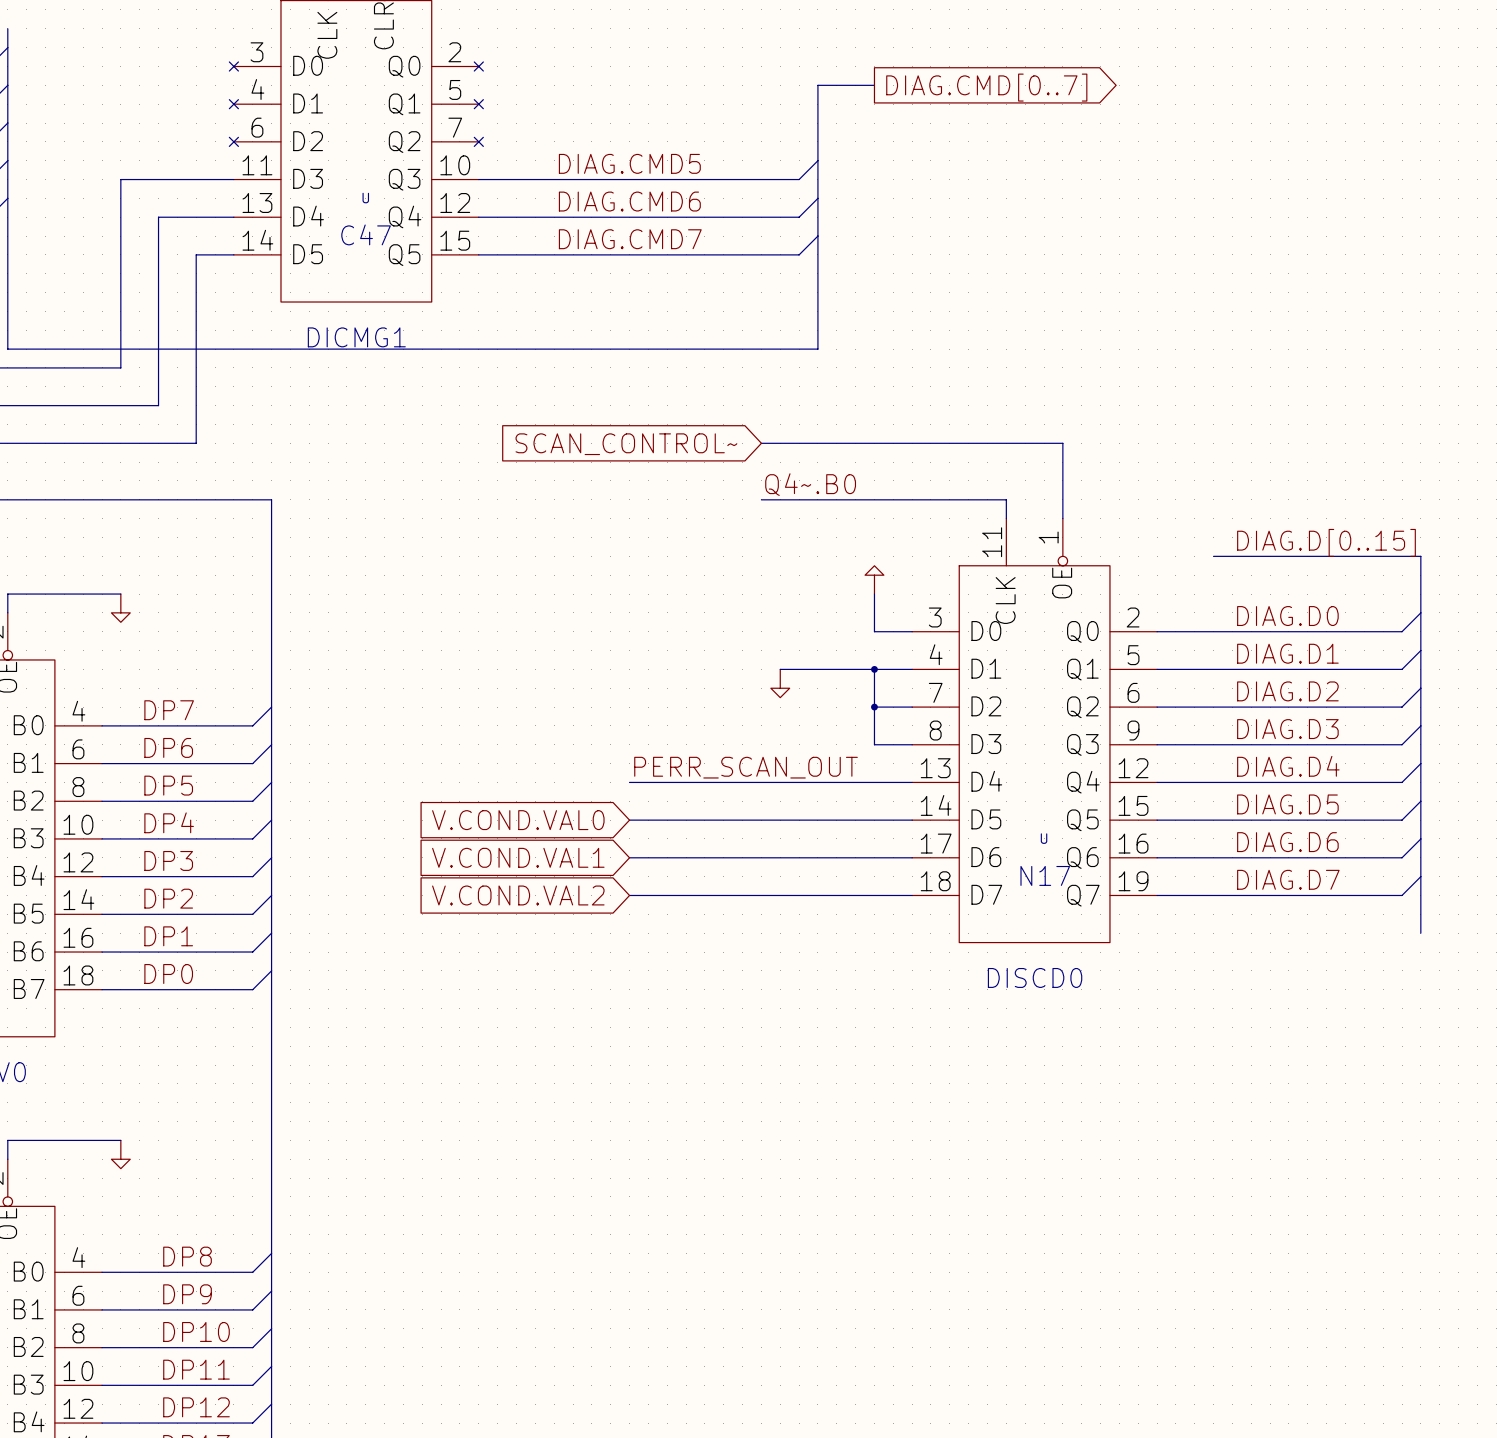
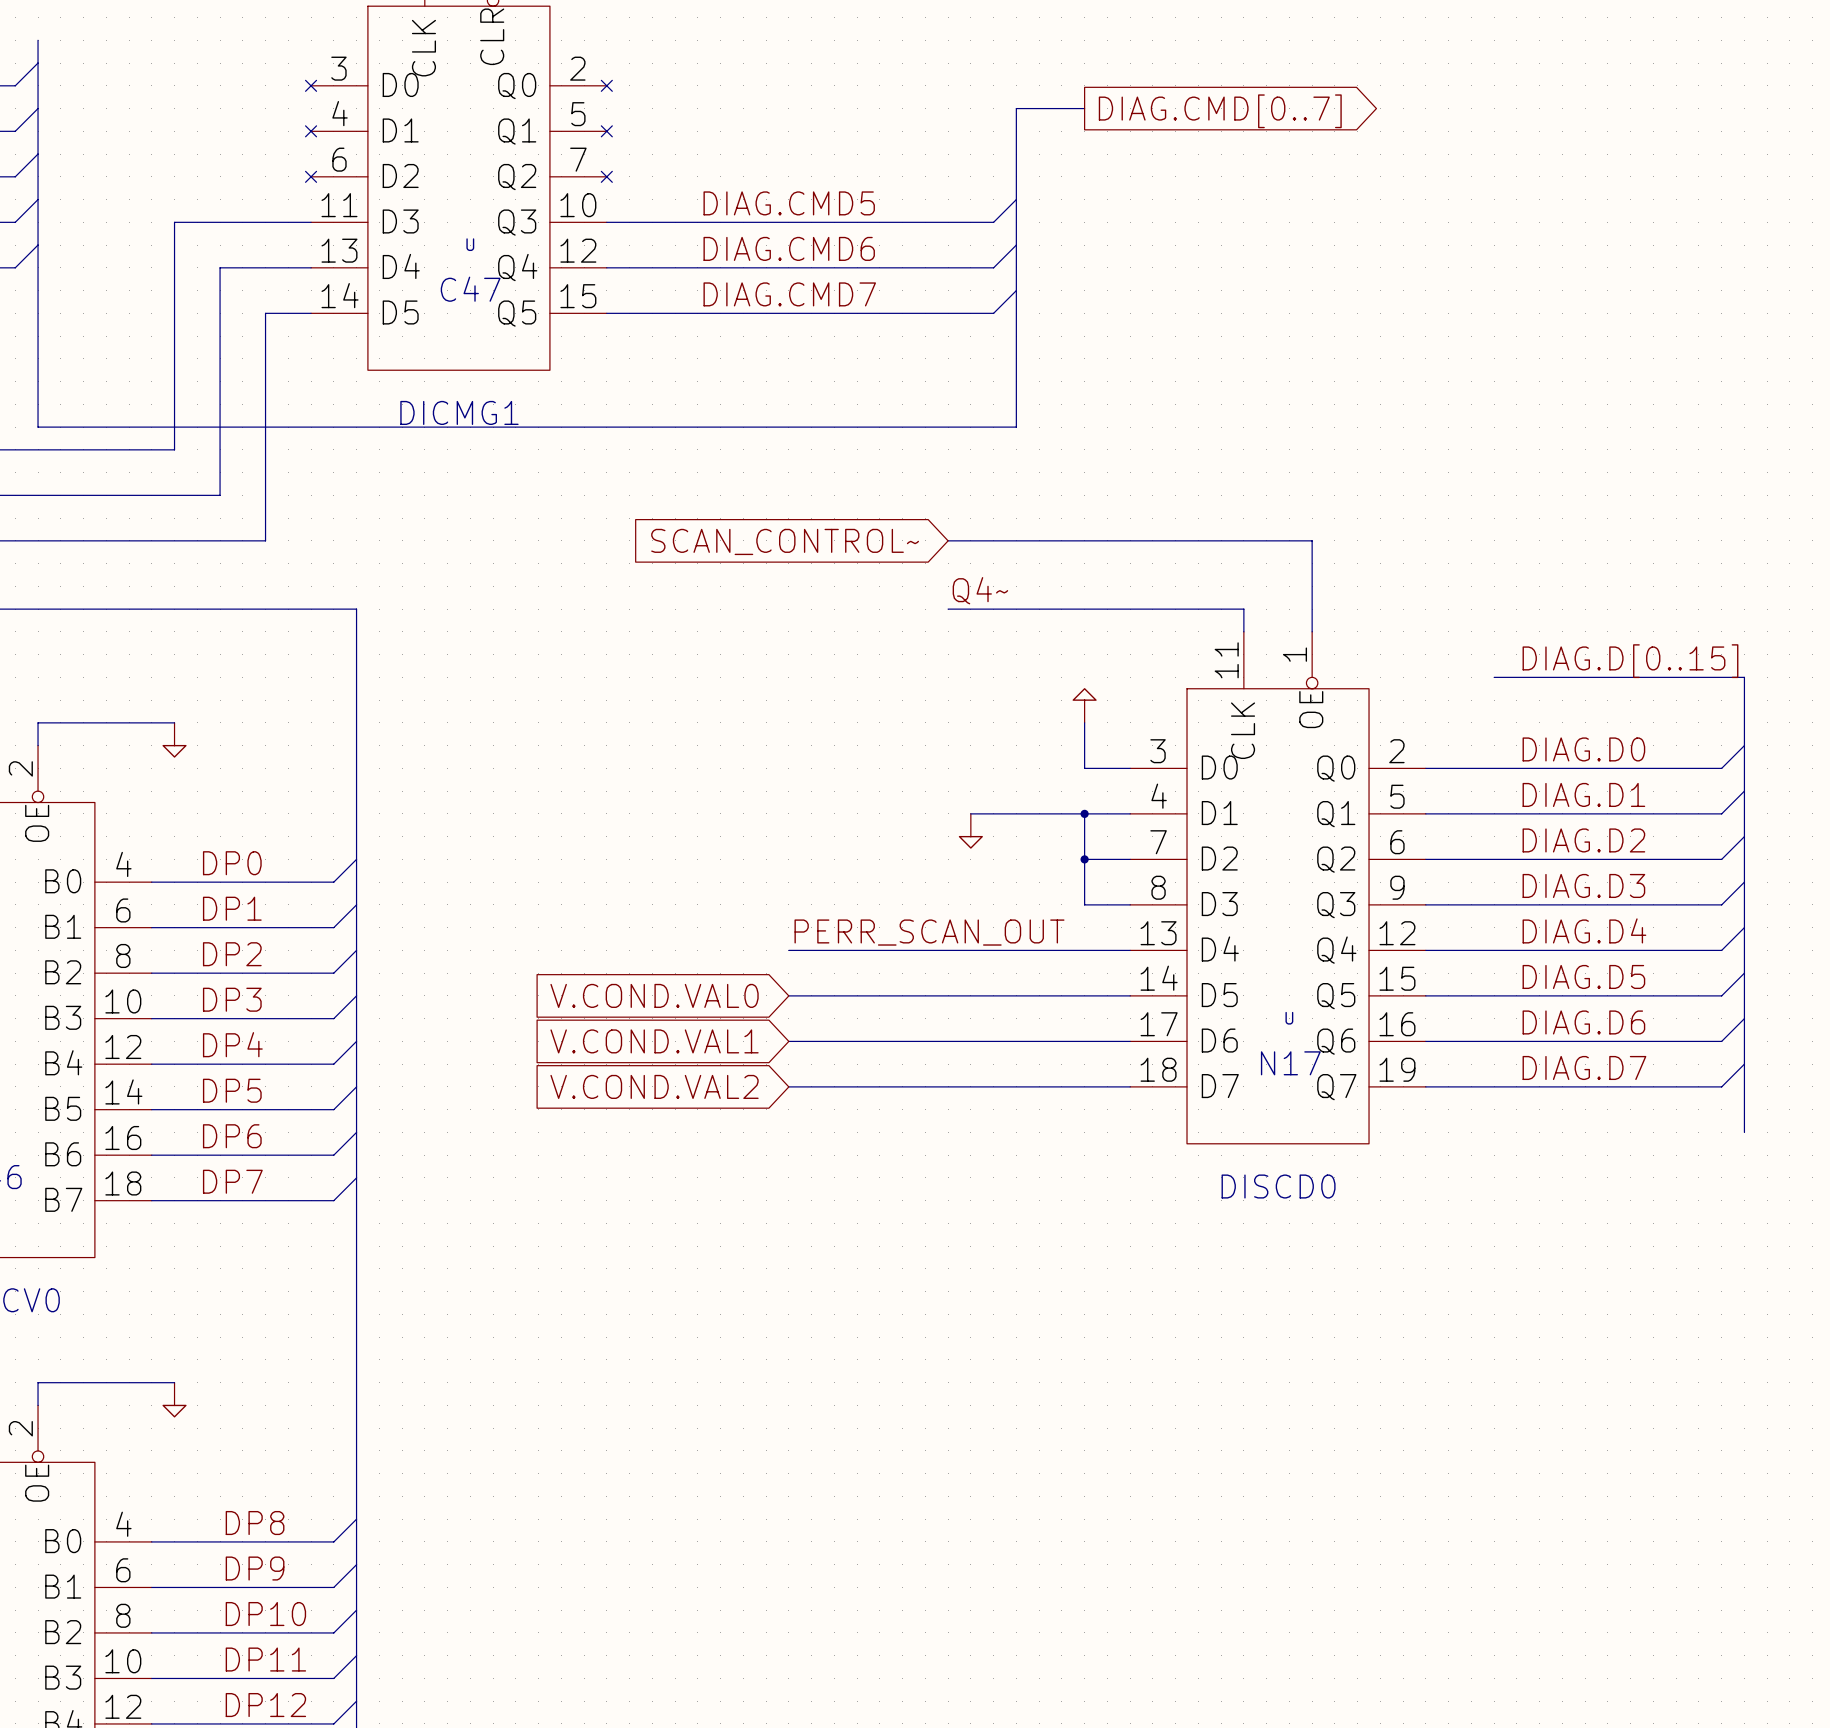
label: Q4~.B0 (810, 484) -> Q4~ (980, 590)
label: DP7 (169, 710) -> DP0 (232, 863)
label: DP6 (168, 747) -> DP1 (232, 908)
label: DP5 (168, 785) -> DP2 (232, 954)
label: DP4 (169, 822) -> DP3 (232, 999)
label: DP3 (168, 860) -> DP4 (232, 1044)
label: DP2 (168, 898) -> DP5 (232, 1090)
label: DP1 (168, 936) -> DP6 (232, 1136)
label: DP0 (168, 974) -> DP7 (232, 1181)

